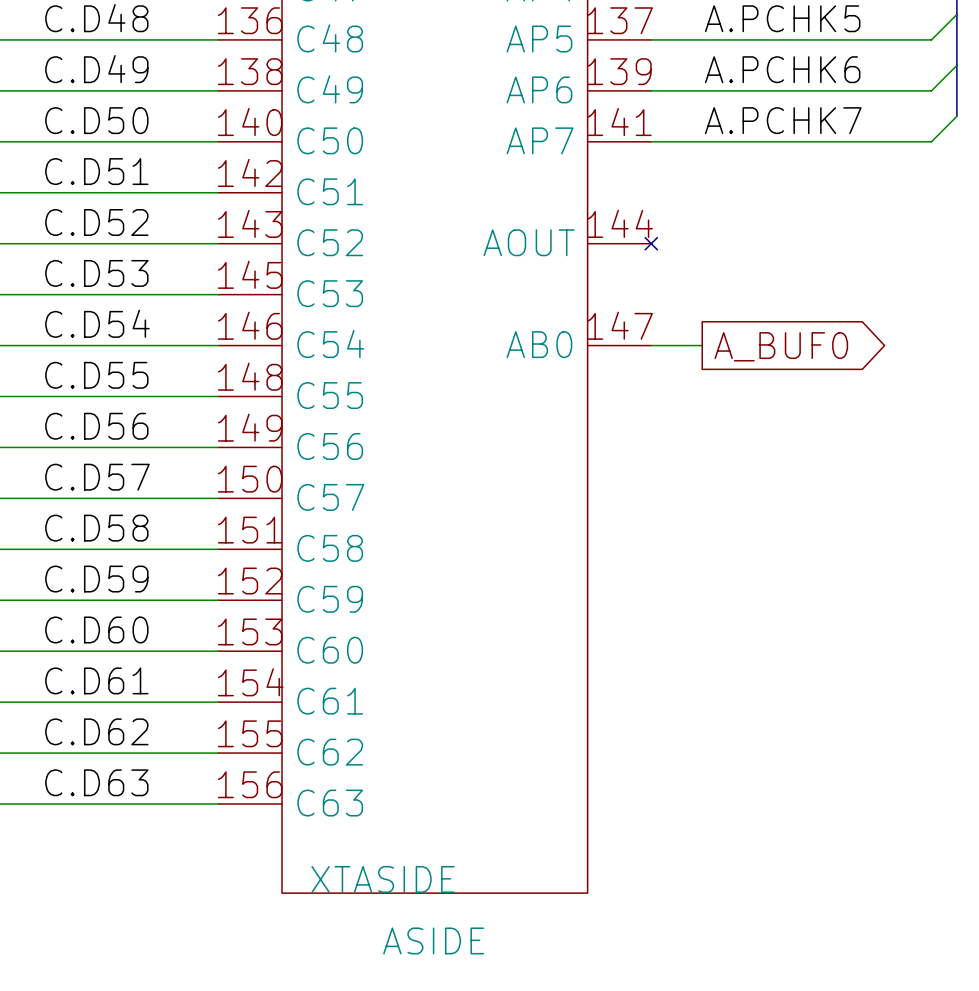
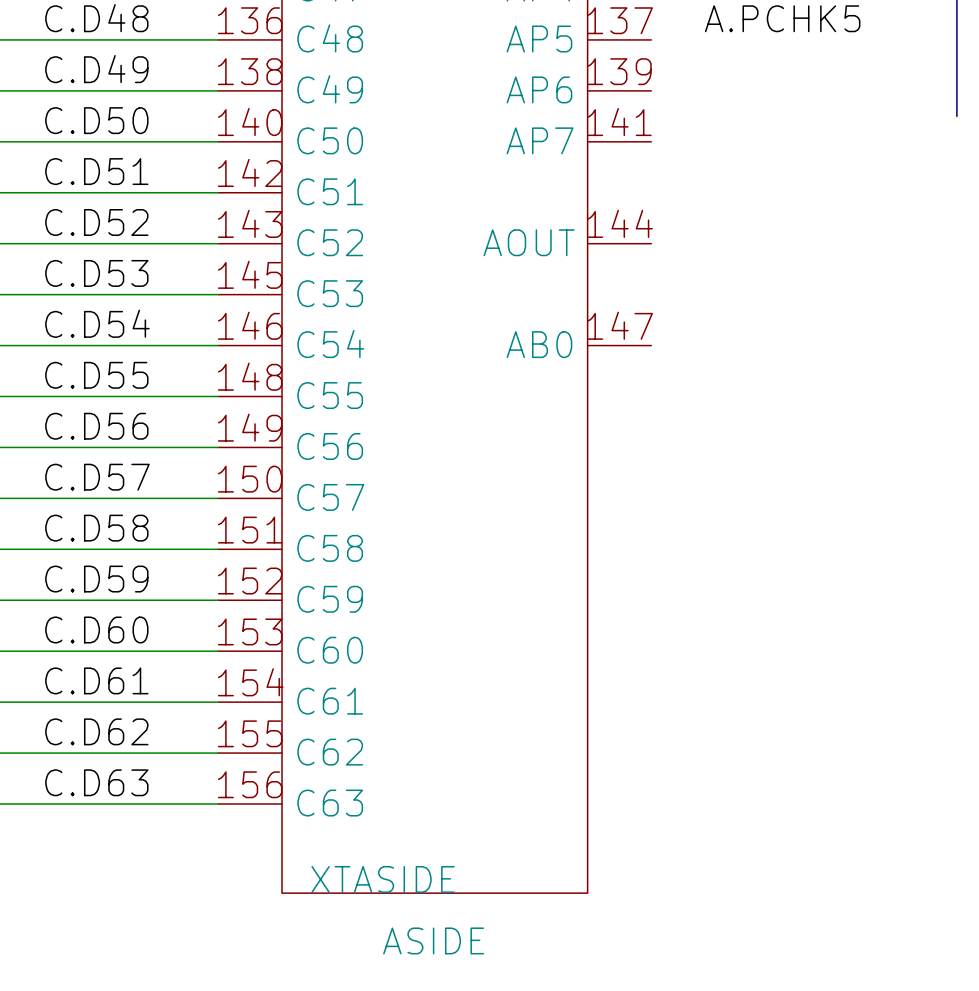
wire: (956, 14) (931, 39) (651, 39) -> none
wire: (956, 65) (931, 90) (651, 90) -> none
label: A.PCHK6 (782, 69) -> none
wire: (956, 116) (931, 141) (651, 141) -> none
label: A.PCHK7 (783, 120) -> none
no-connect mark: (651, 243) -> none
wire: (651, 345) (702, 345) -> none
global label: A_BUF0 (781, 346) -> none

